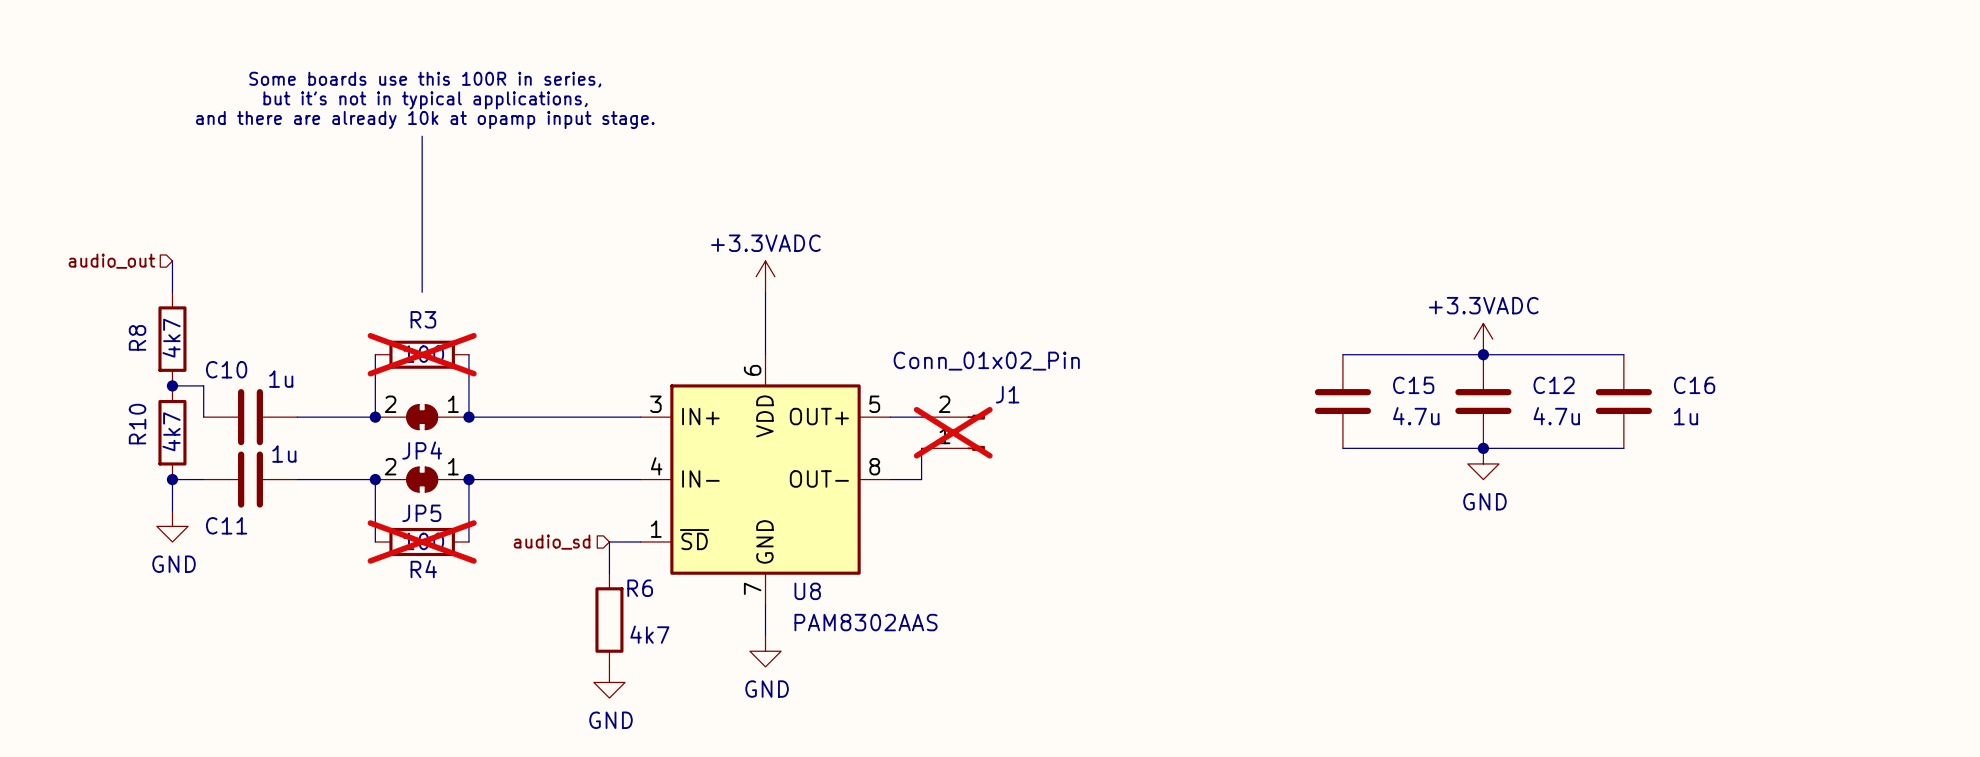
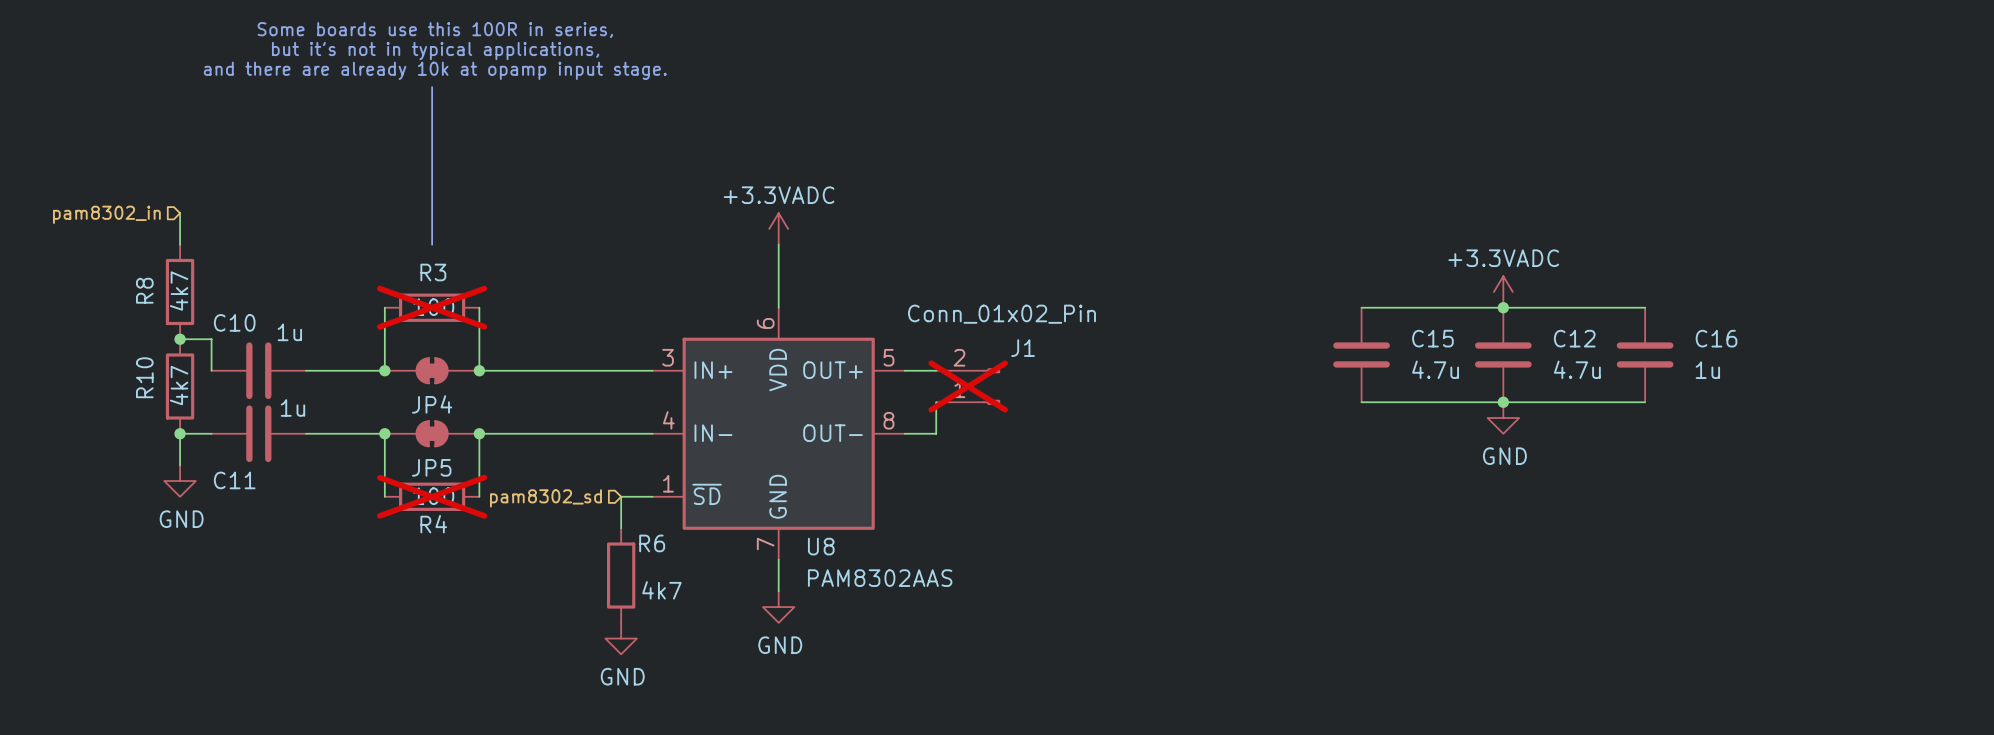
hierarchical label: audio_out (111, 261) -> pam8302_in (106, 214)
JP4 pin number: 2 (390, 404) -> none
JP4 pin number: 1 (453, 404) -> none
JP5 pin number: 2 (390, 466) -> none
JP5 pin number: 1 (453, 466) -> none
hierarchical label: audio_sd (552, 542) -> pam8302_sd (545, 498)

